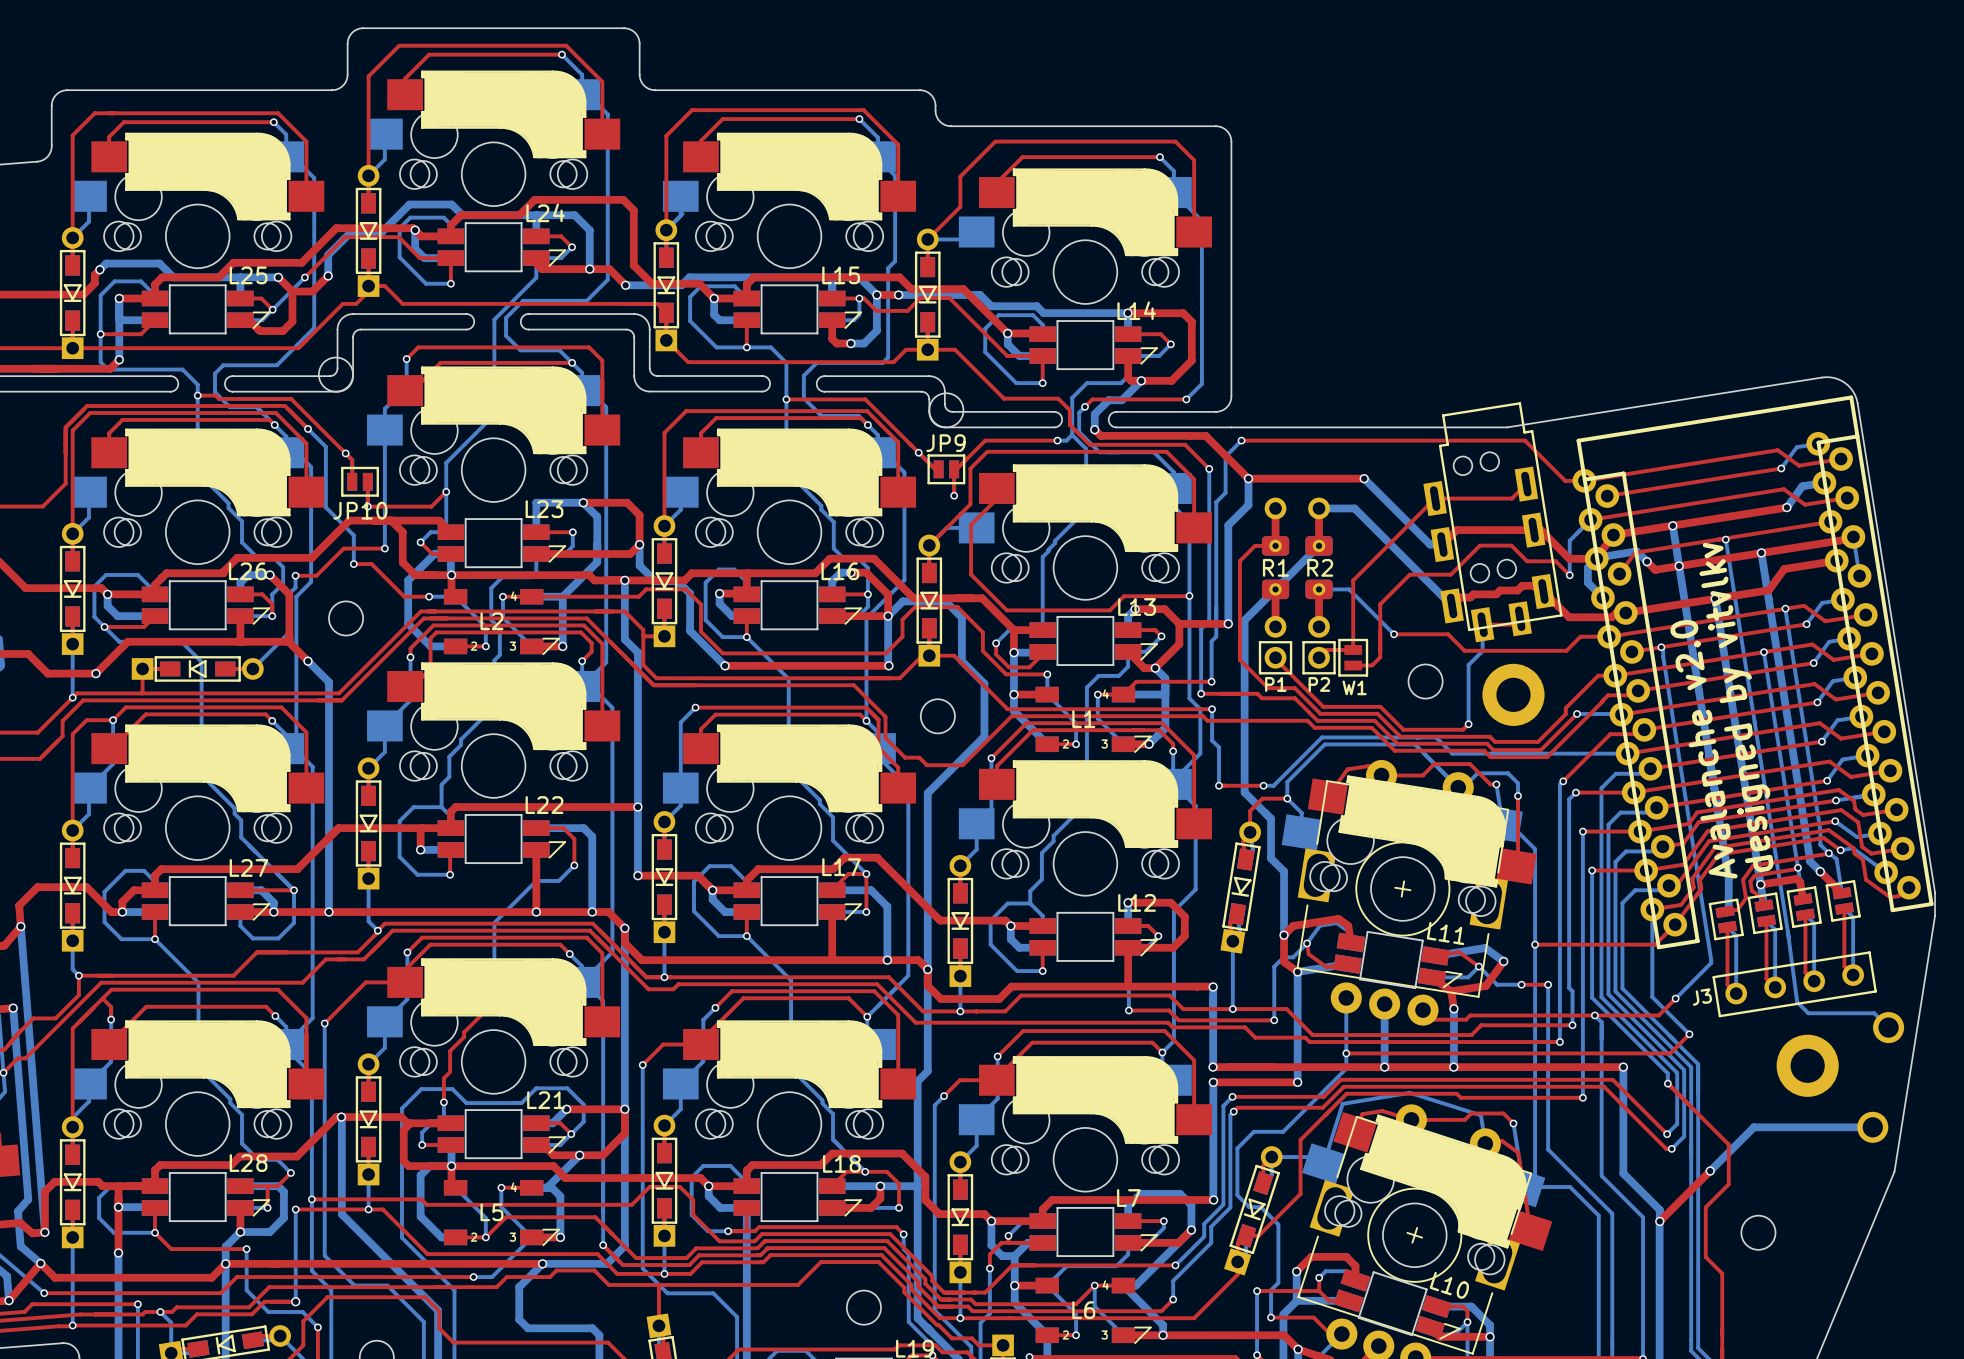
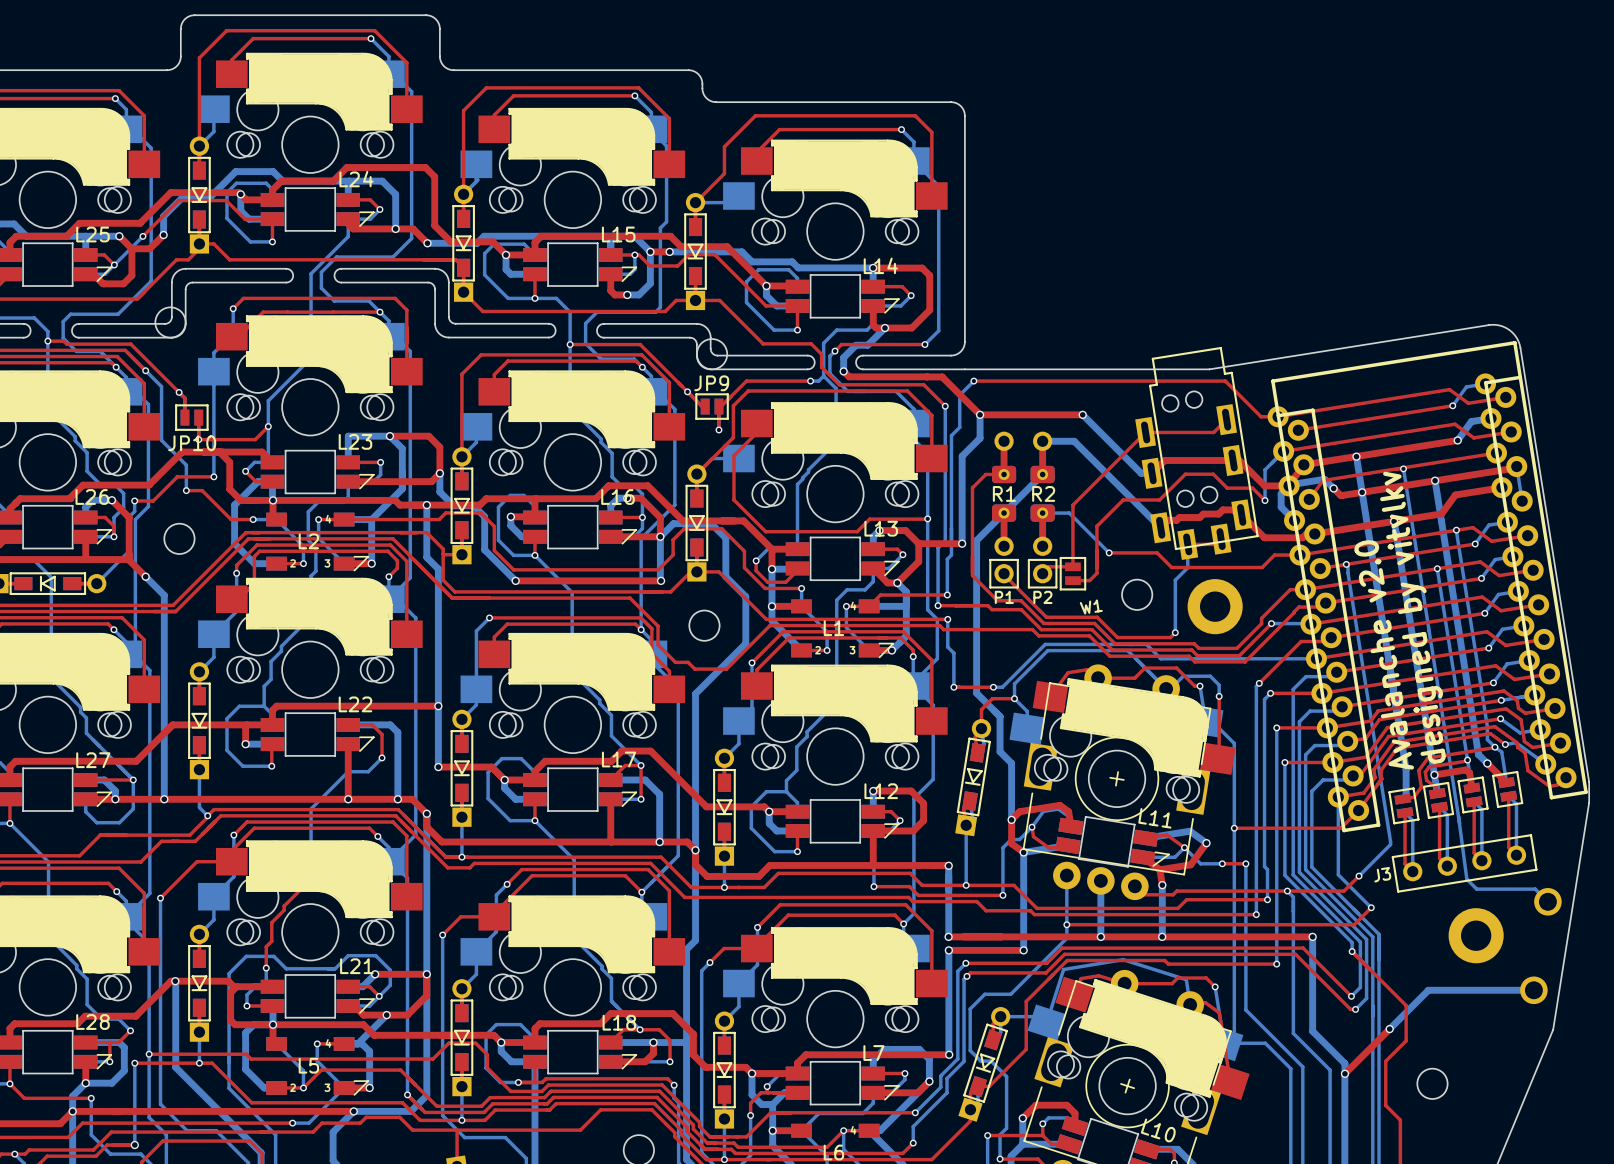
text rotation: 0° (1354, 687) -> 9° counterclockwise (1091, 606)

